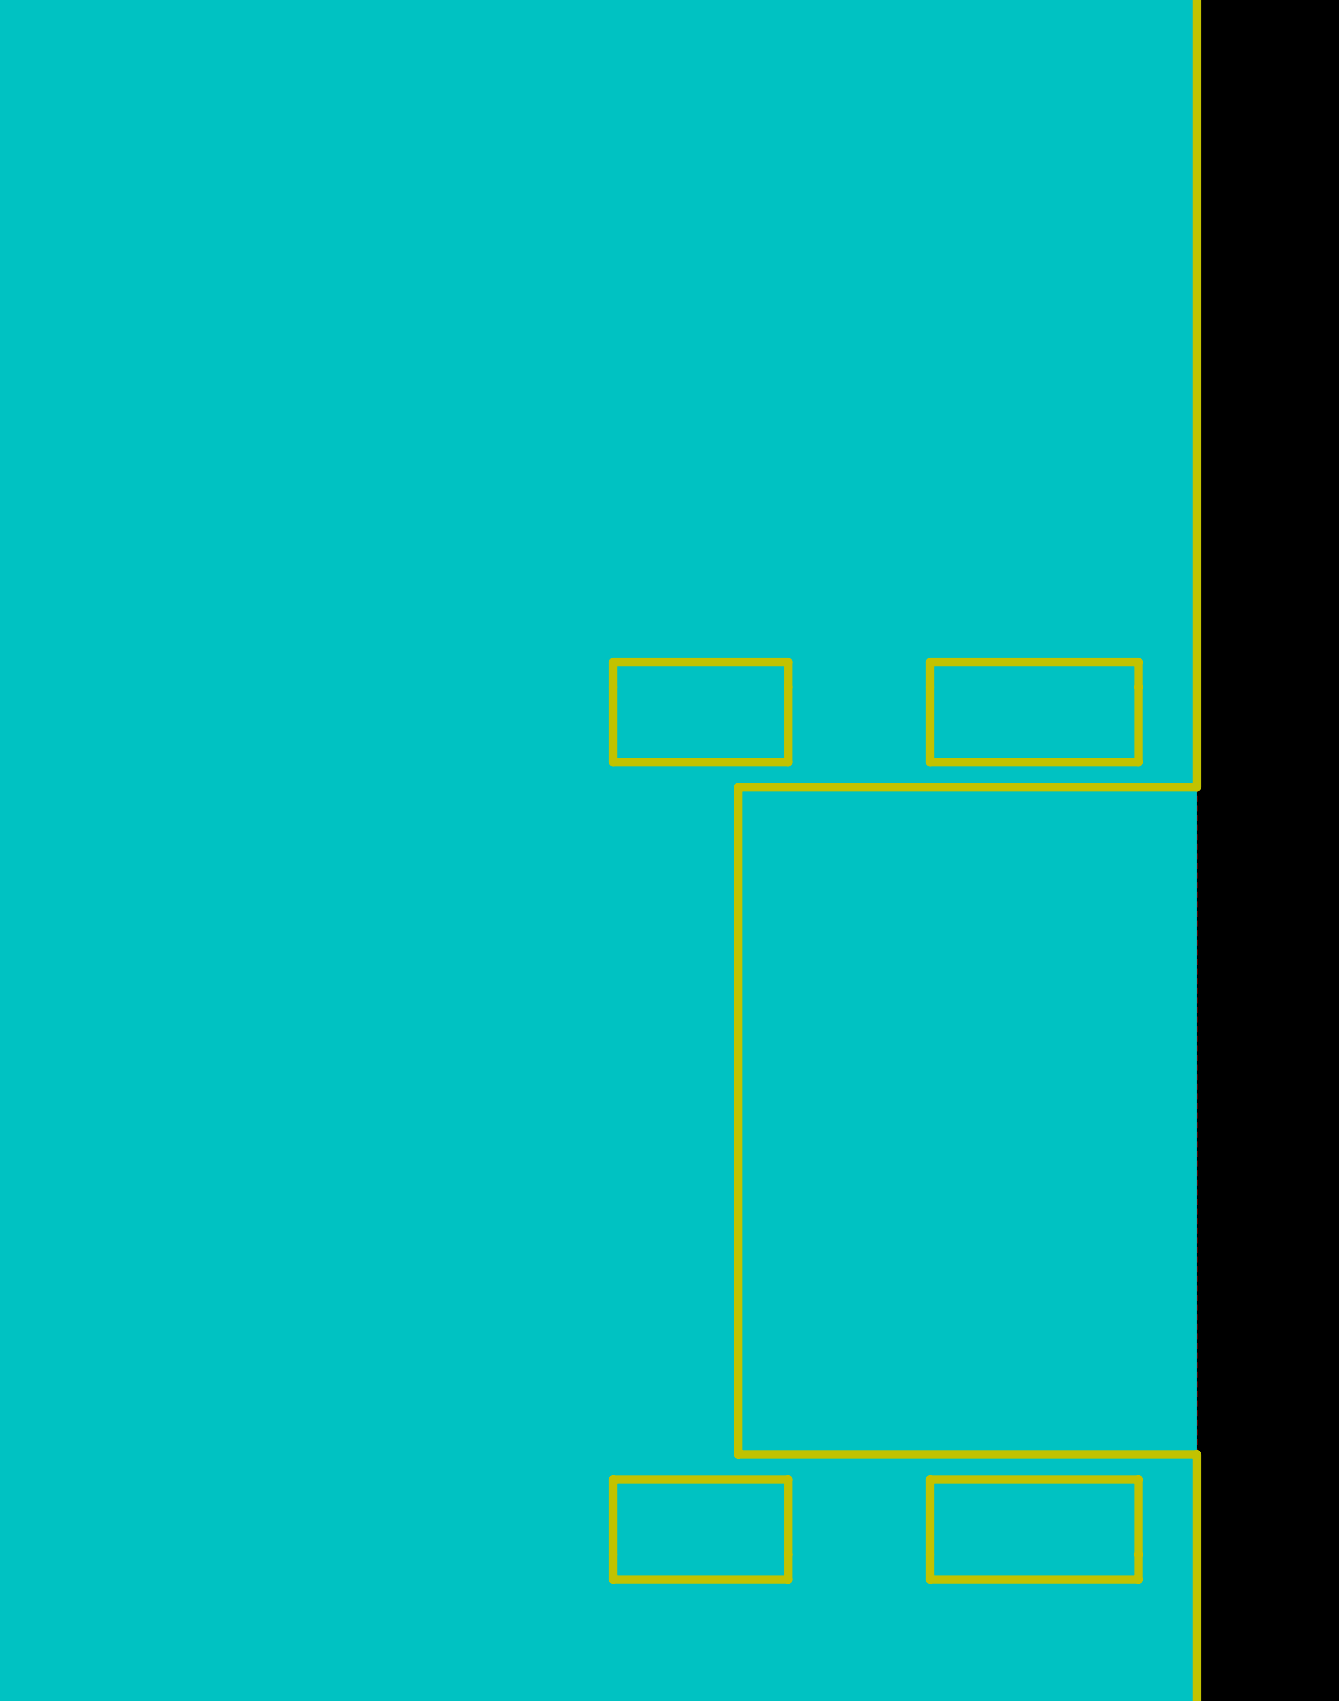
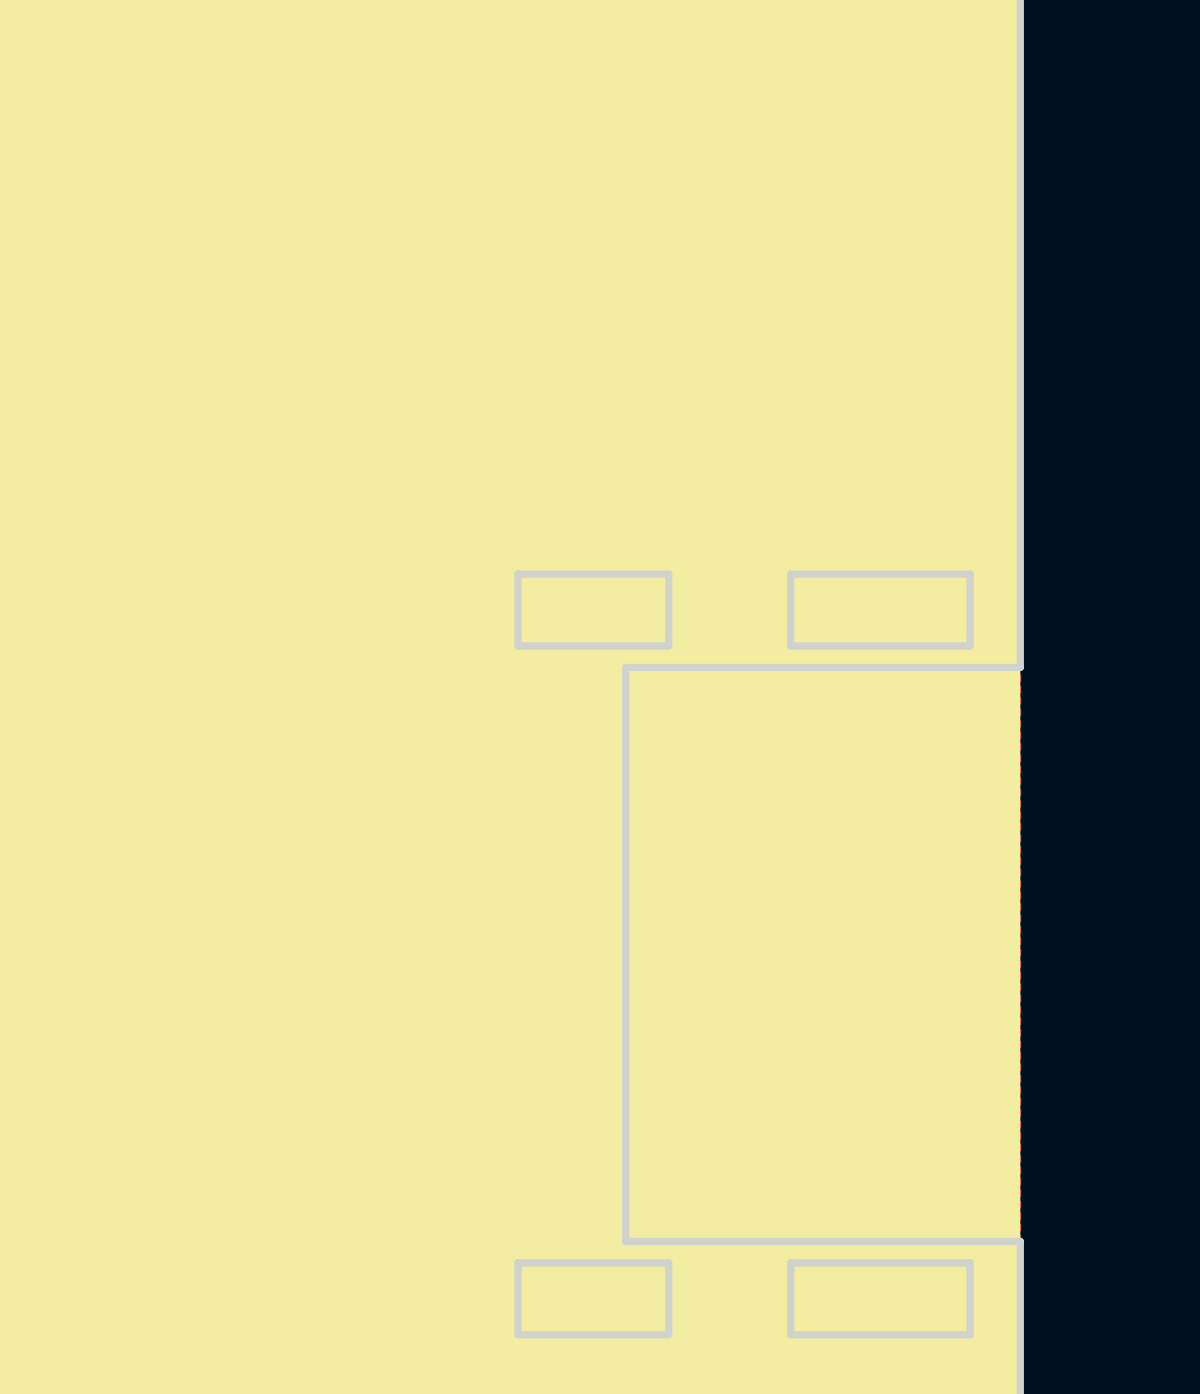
board edge: (613, 678) (613, 662) (788, 662) (788, 678) -> (518, 574) (668, 574)
board edge: (930, 678) (930, 662) (1138, 662) (1138, 678) -> (790, 574) (970, 574)
board edge: (613, 1562) (613, 1579) (788, 1579) (788, 1562) -> (518, 1334) (668, 1334)
board edge: (930, 1562) (930, 1579) (1138, 1579) (1138, 1562) -> (790, 1334) (970, 1334)

